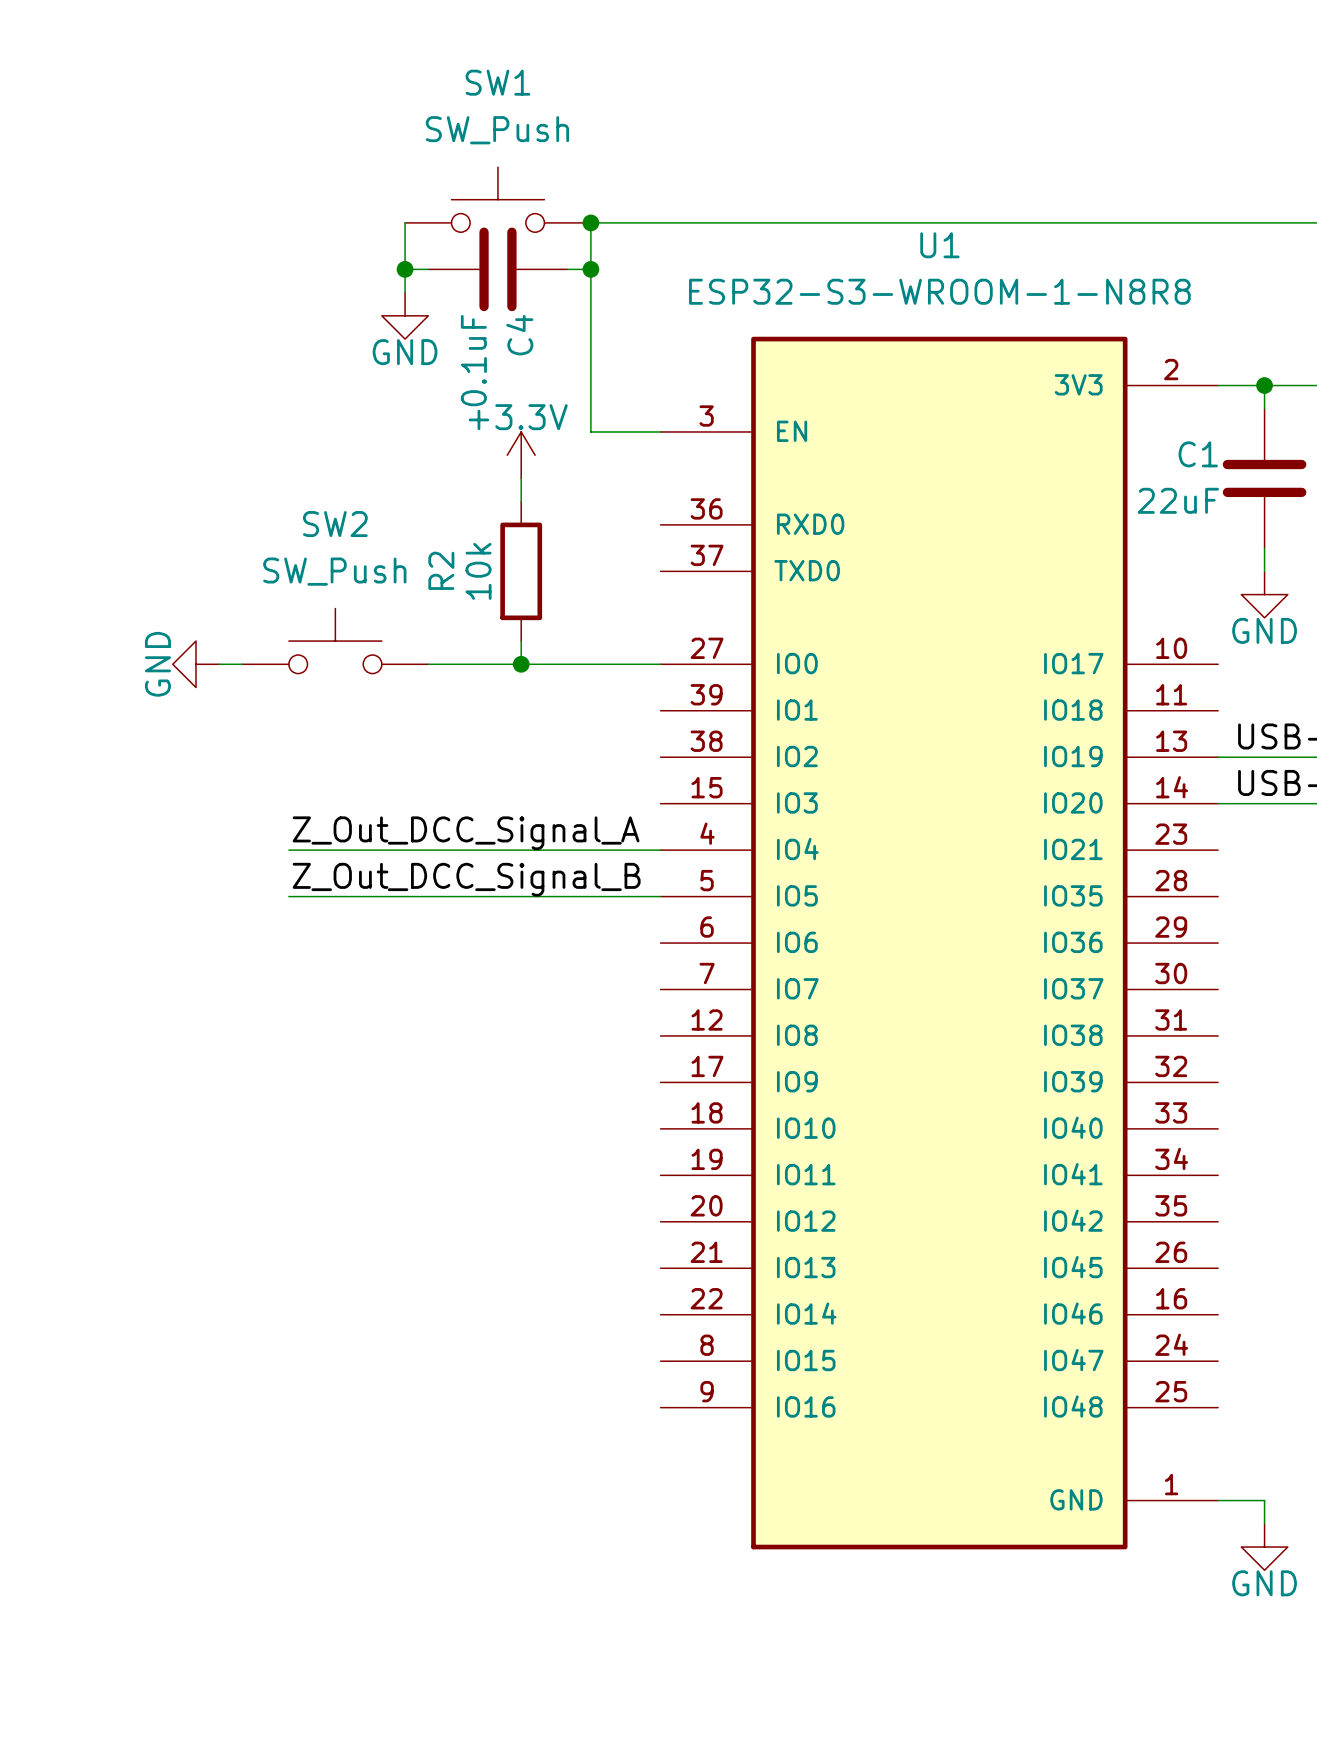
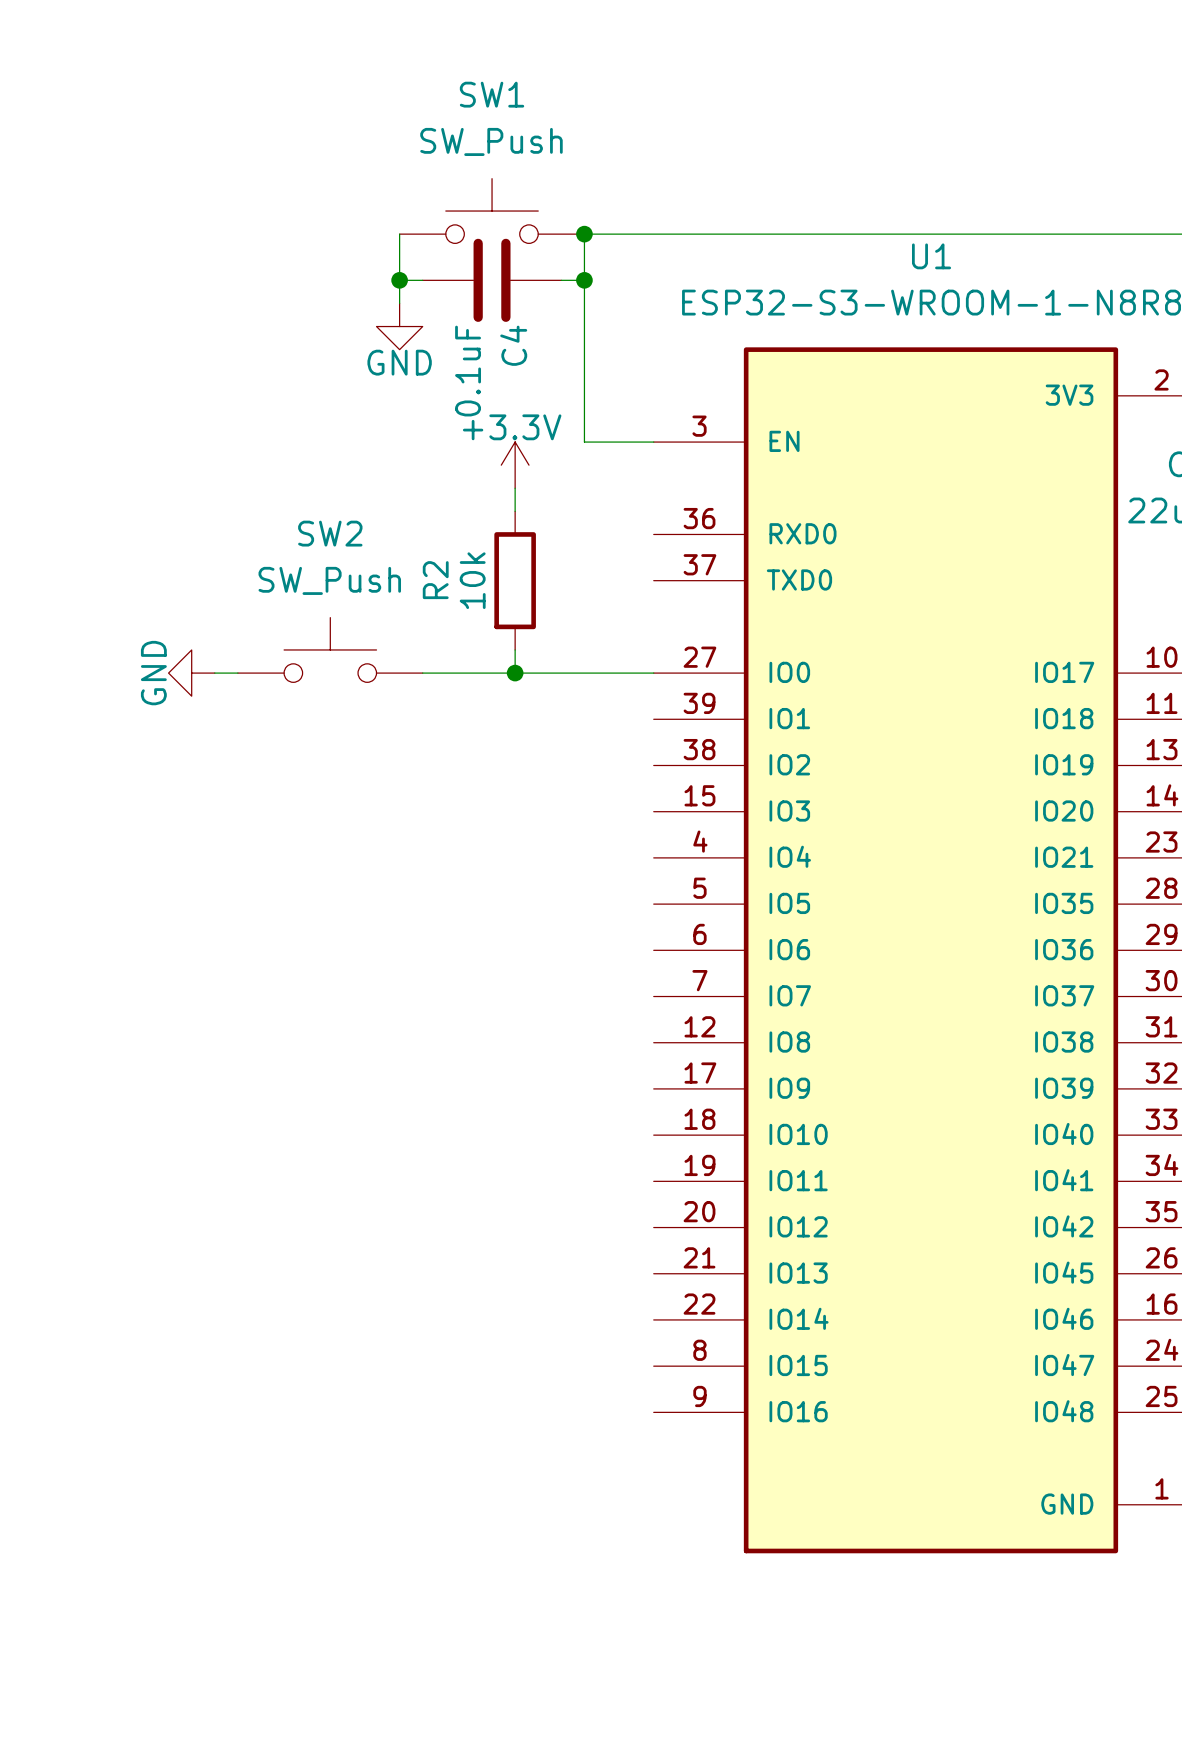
label: Z_Out_DCC_Signal_A (466, 833) -> none
wire: (288, 850) (660, 850) -> none
label: Z_Out_DCC_Signal_B (466, 879) -> none
wire: (288, 896) (660, 896) -> none

